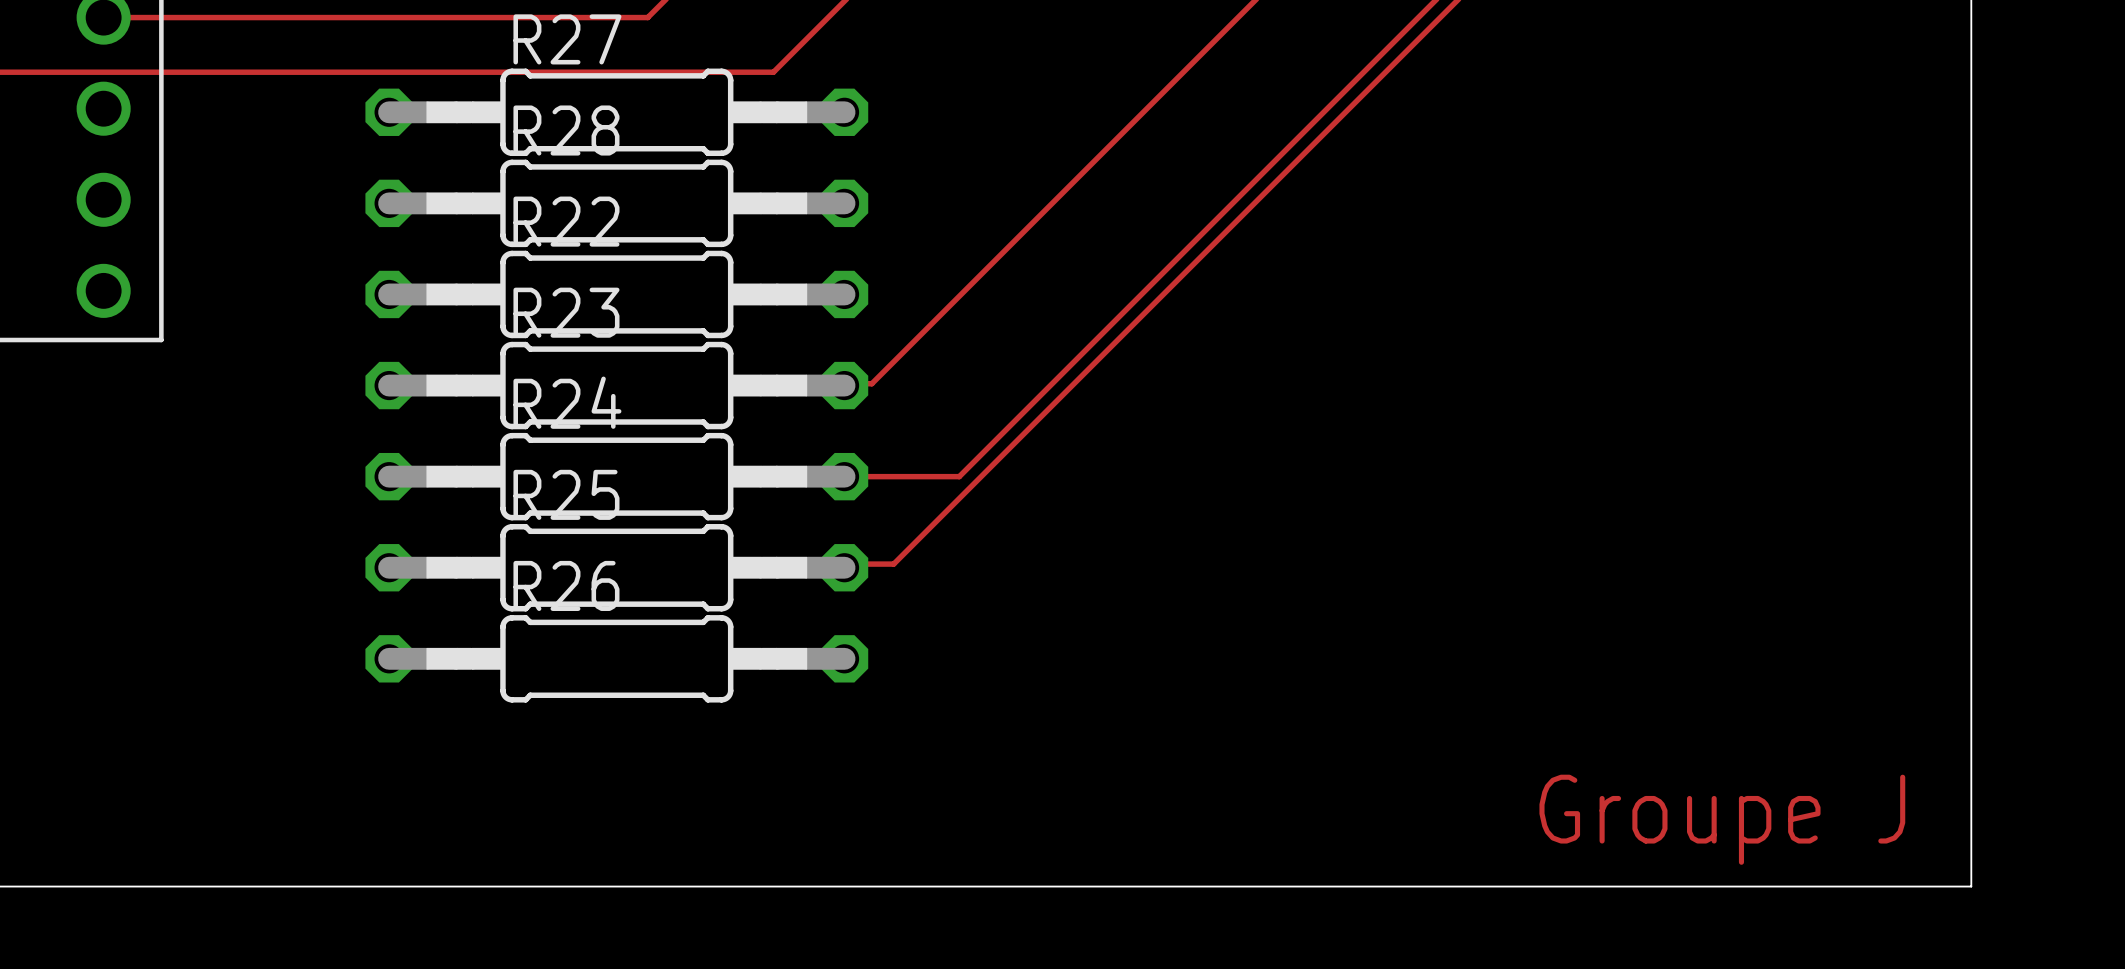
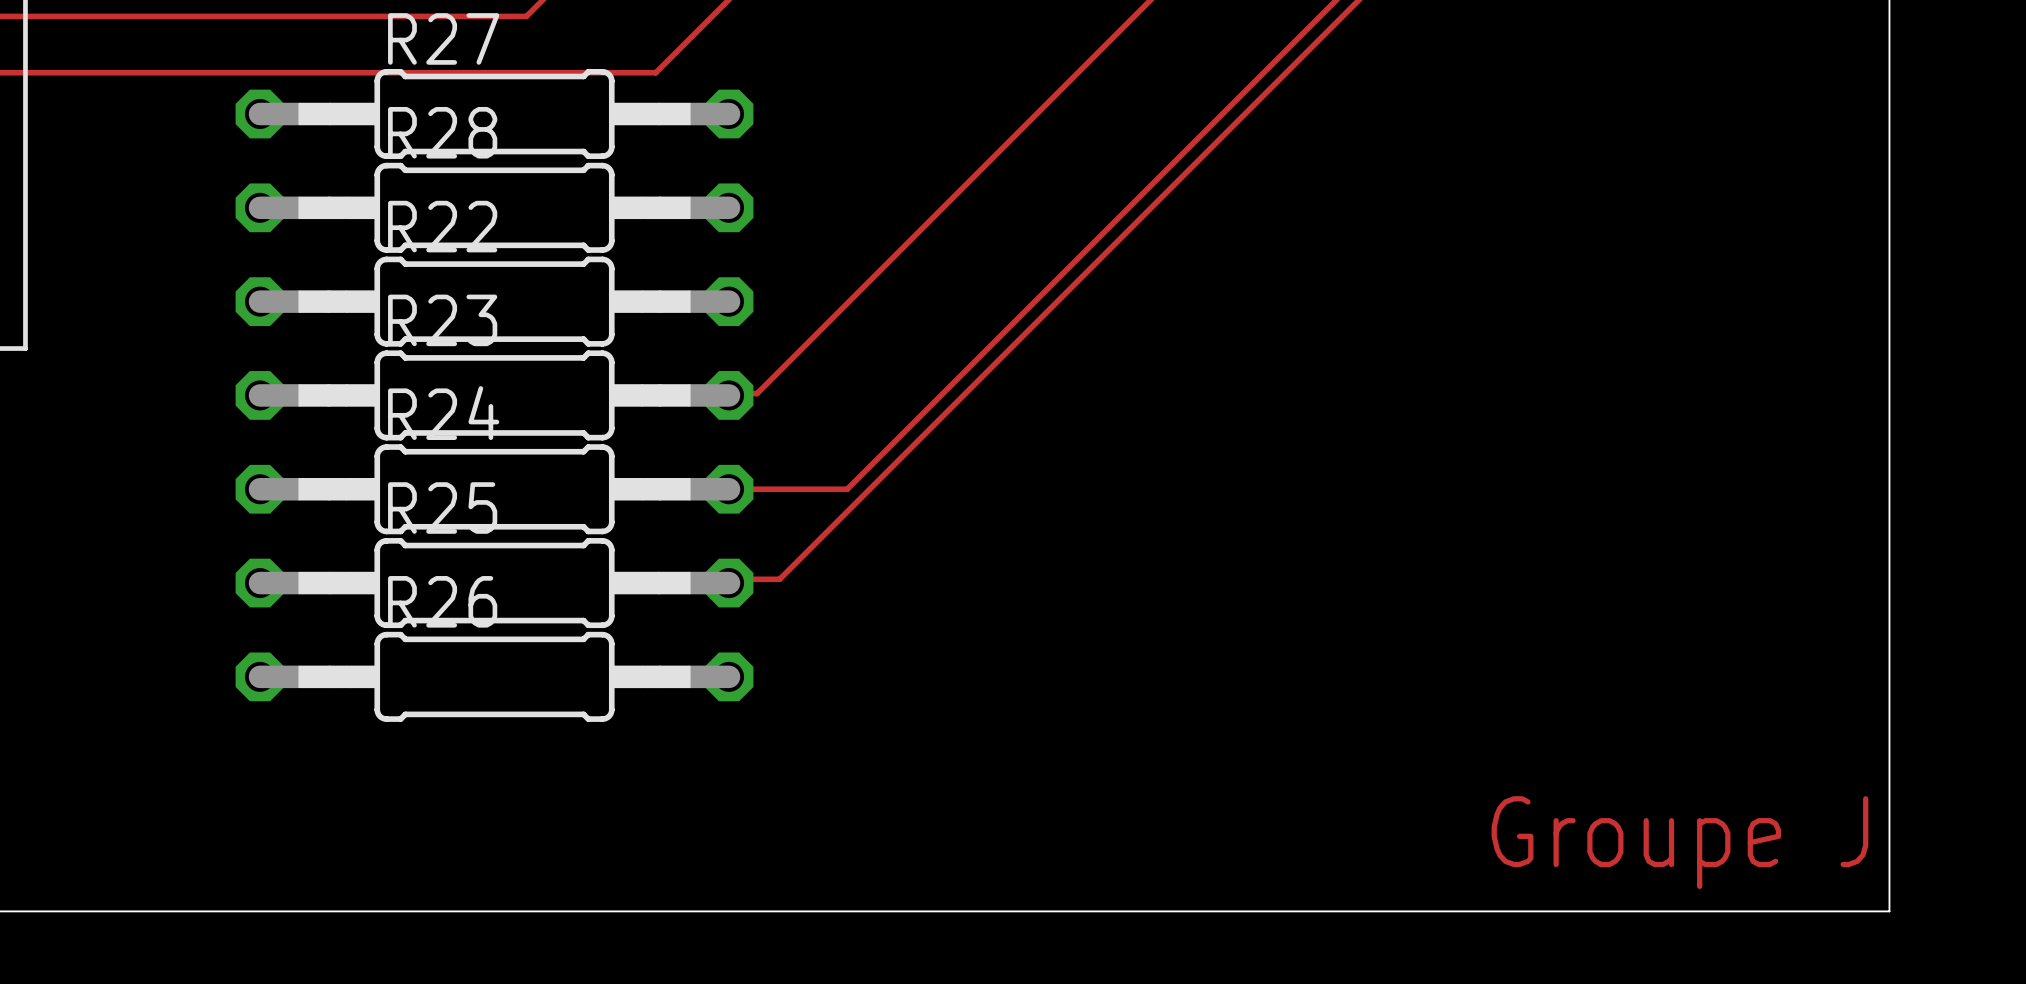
text position: Groupe J (1722, 819) -> Groupe J (1679, 842)

